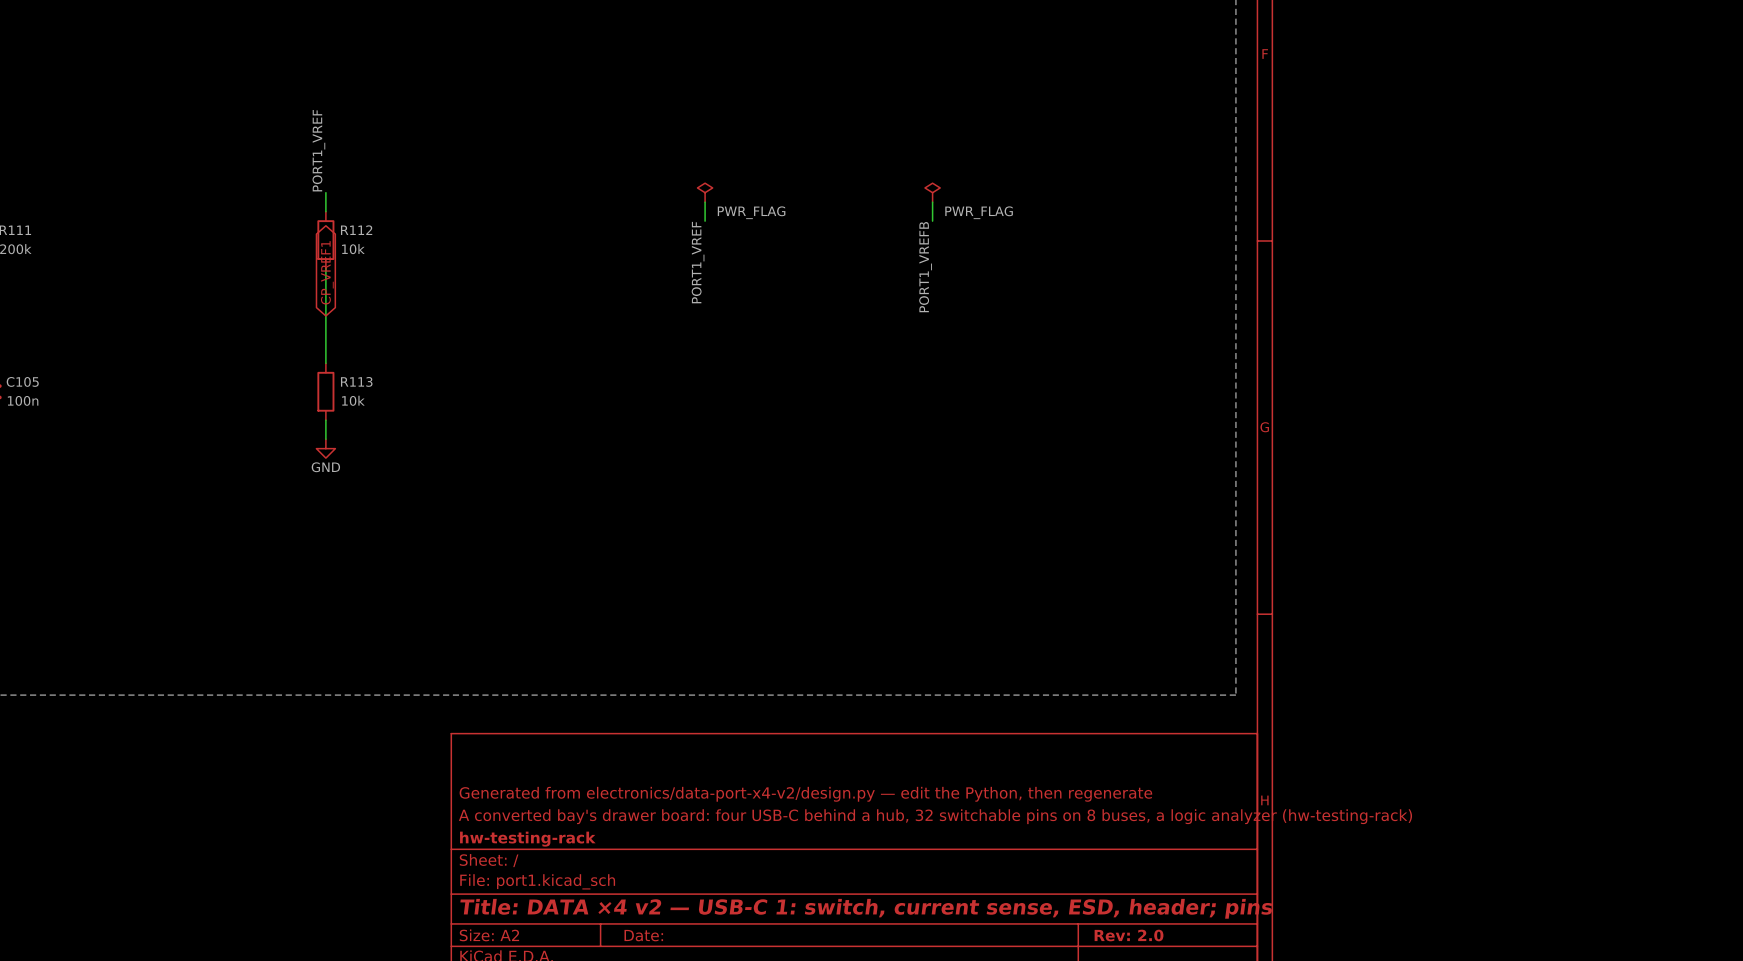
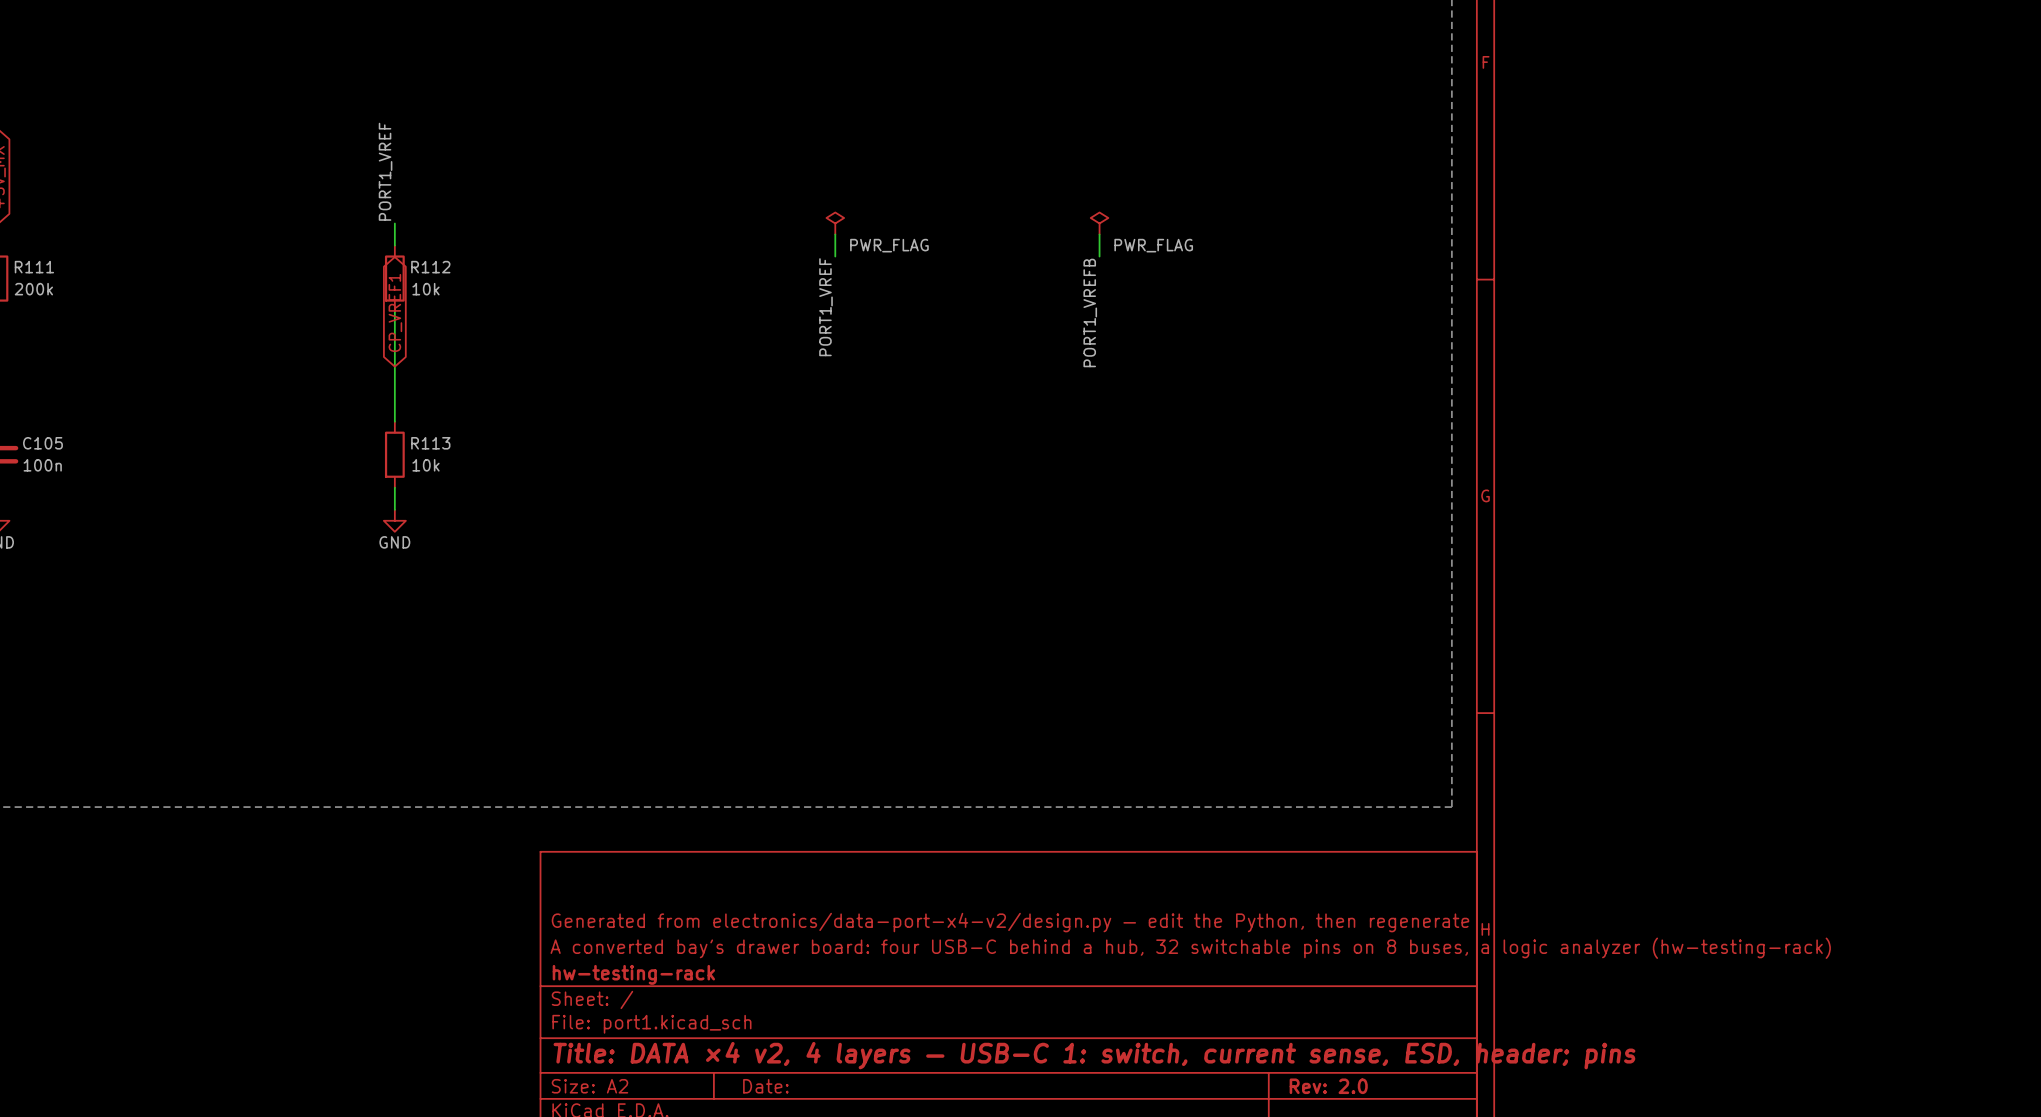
title block: Title: DATA ×4 v2 — USB-C 1: switch, current sense, ESD, header; pins (866, 908) -> Title: DATA ×4 v2, 4 layers — USB-C 1: switch, current sense, ESD, header; pins (1094, 1055)

